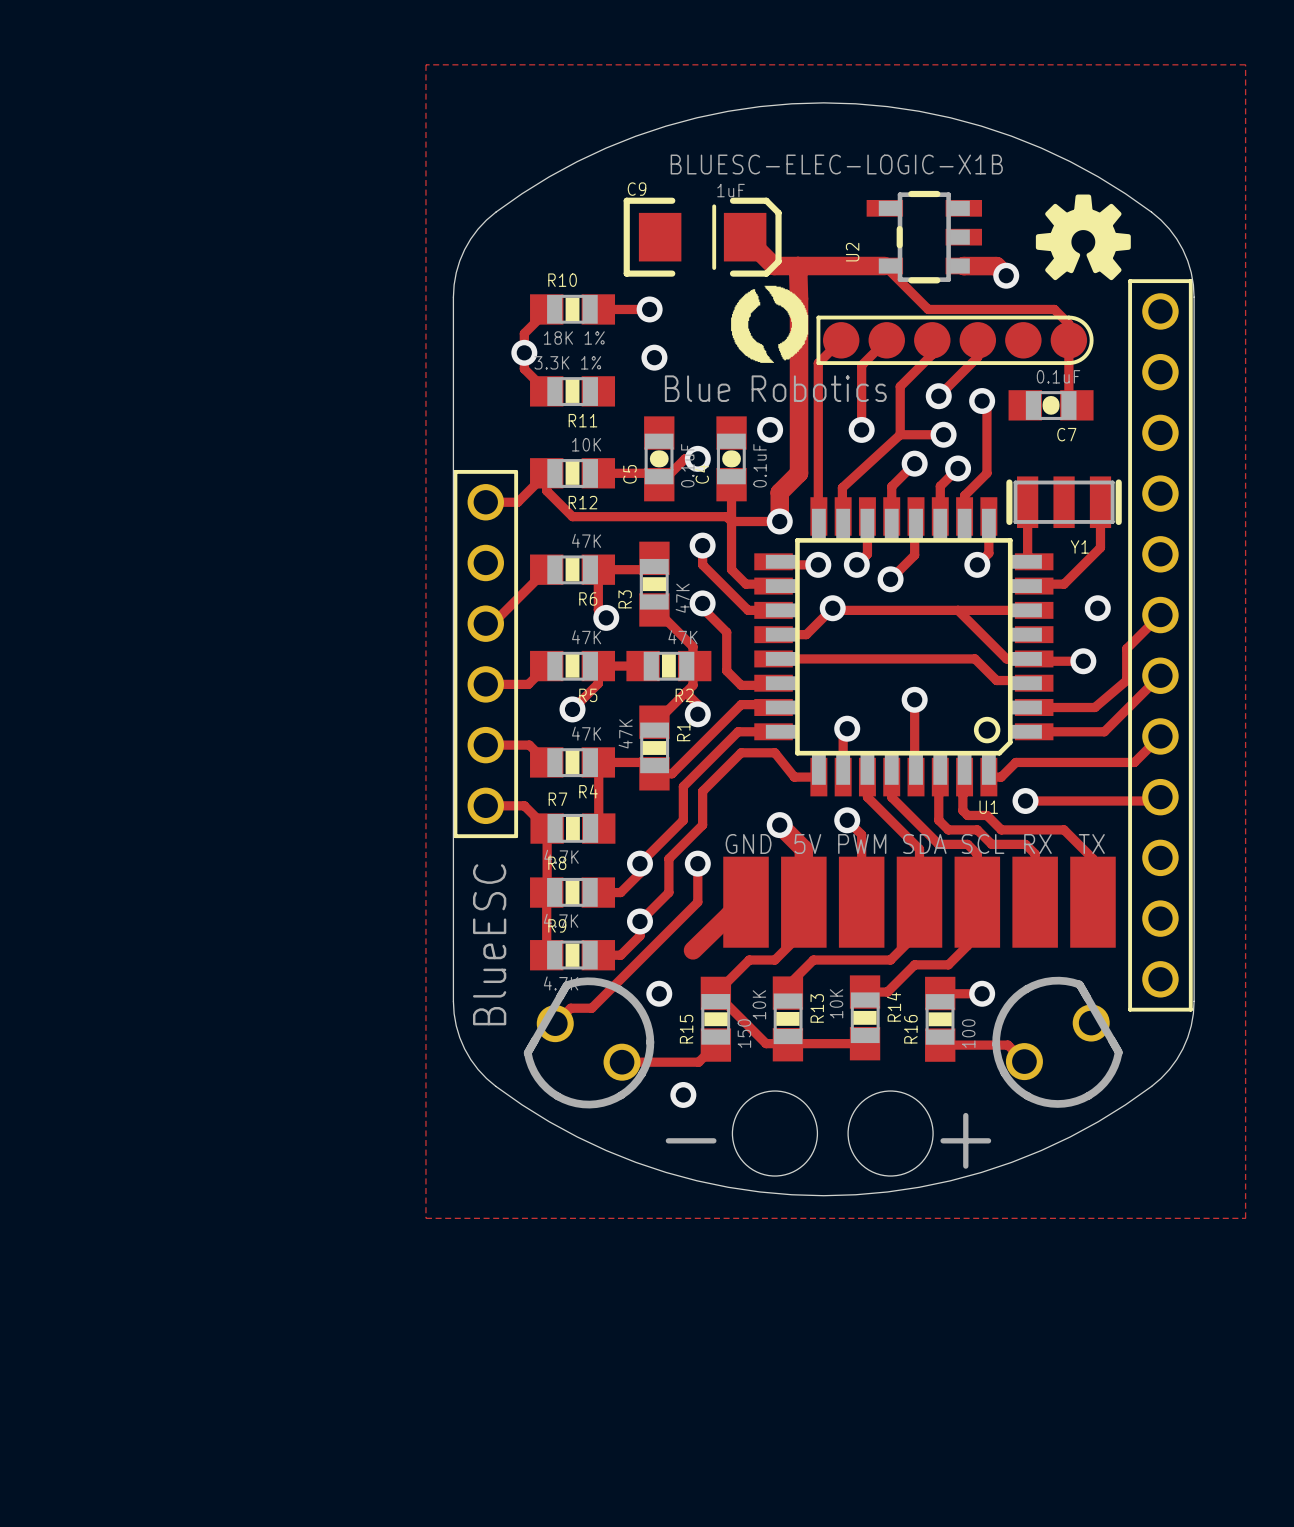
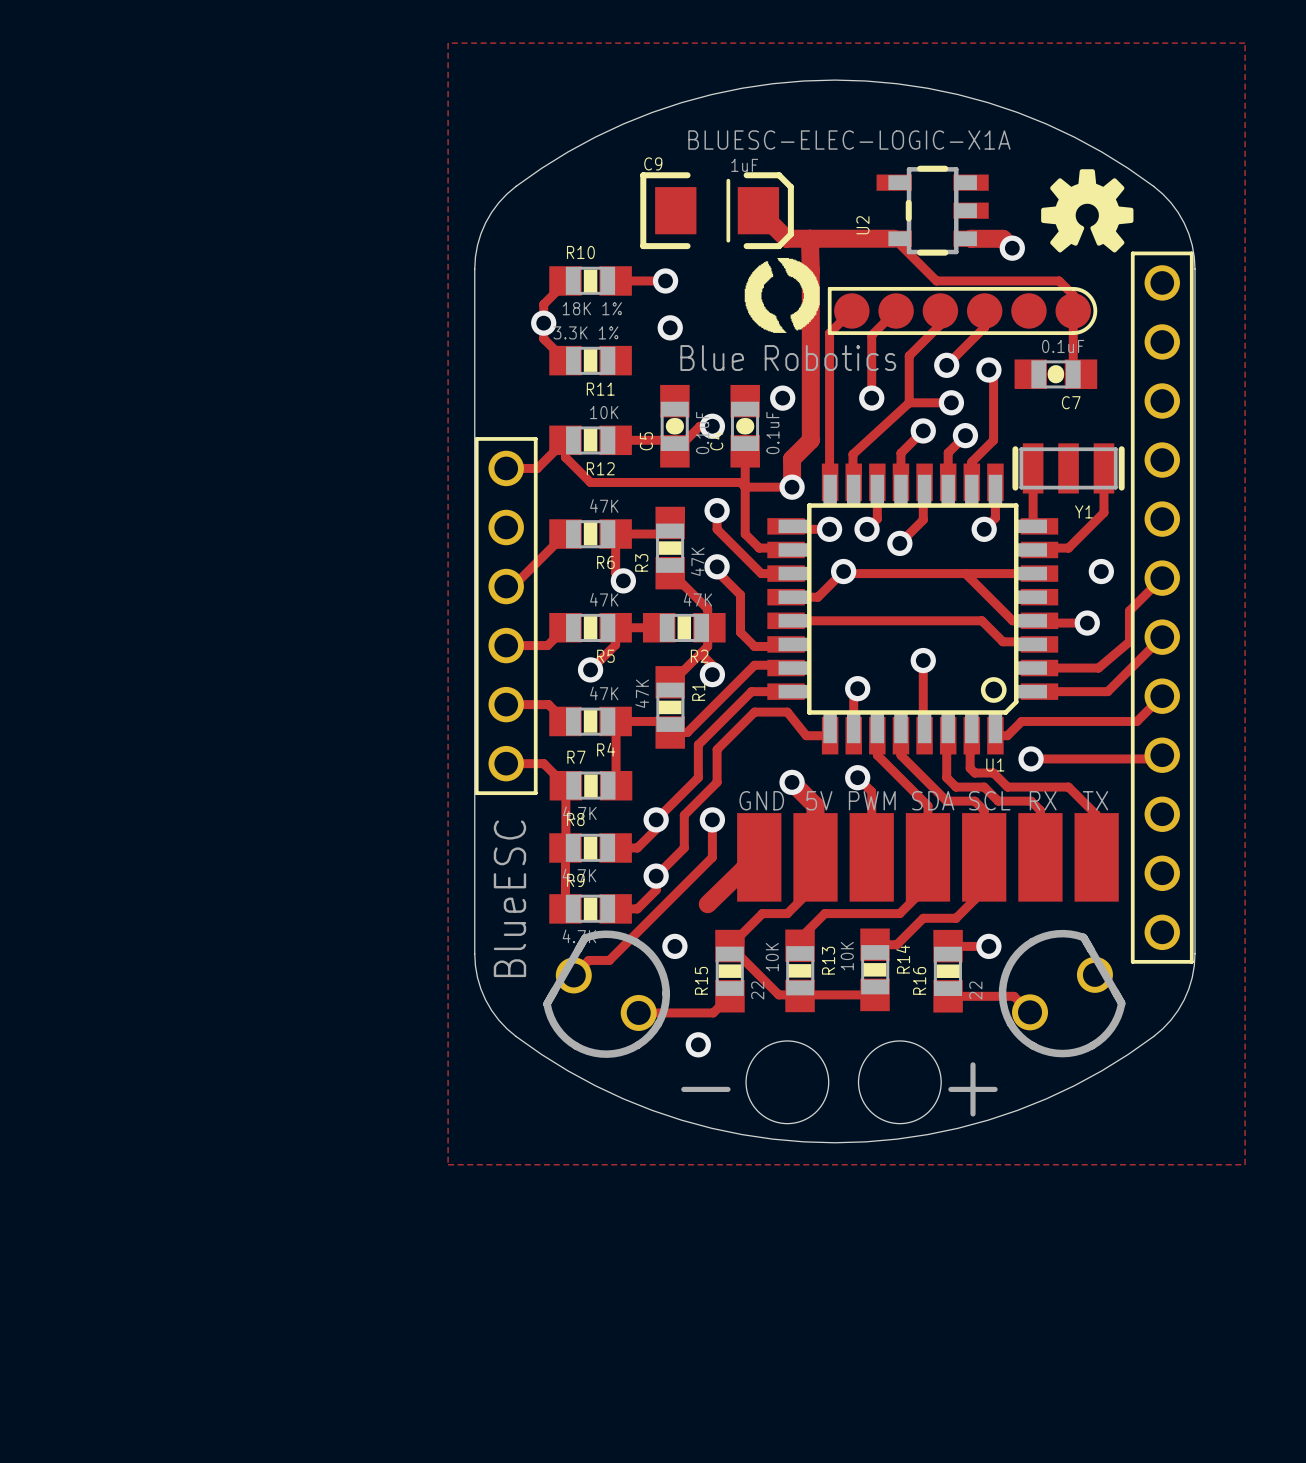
text: BLUESC-ELEC-LOGIC-X1B (836, 164) -> BLUESC-ELEC-LOGIC-X1A (849, 140)
R15 value: 150 (744, 1033) -> 22 (757, 990)
R16 value: 100 (968, 1033) -> 22 (975, 990)

